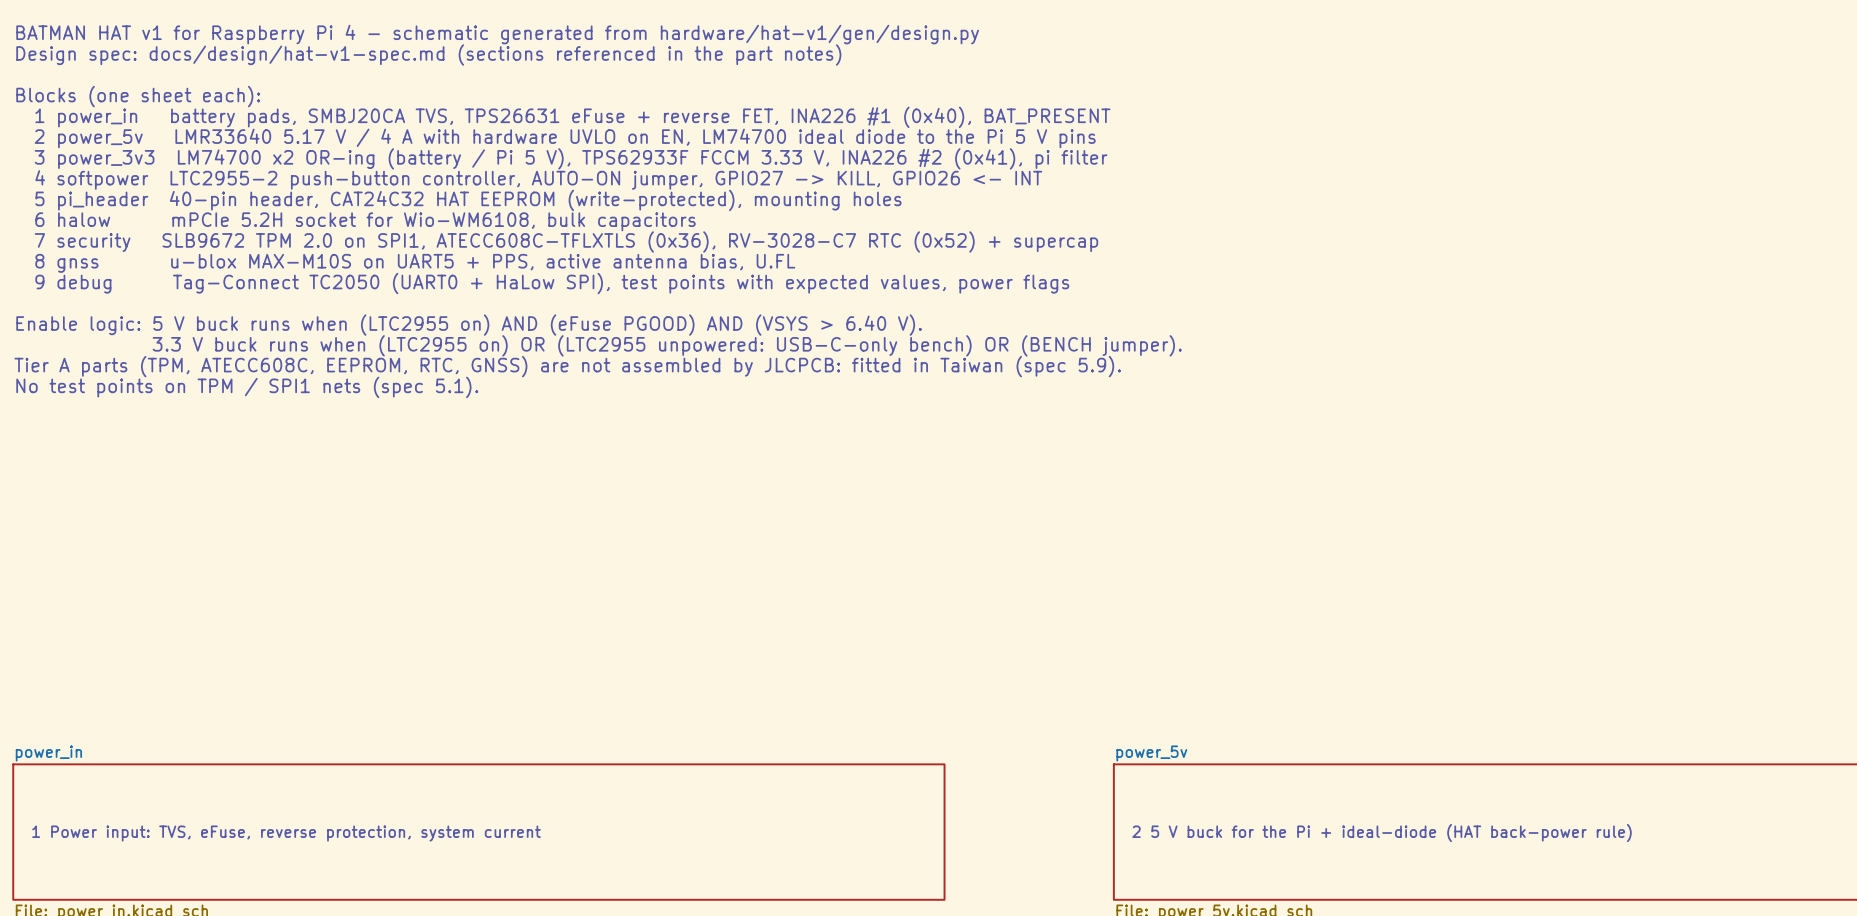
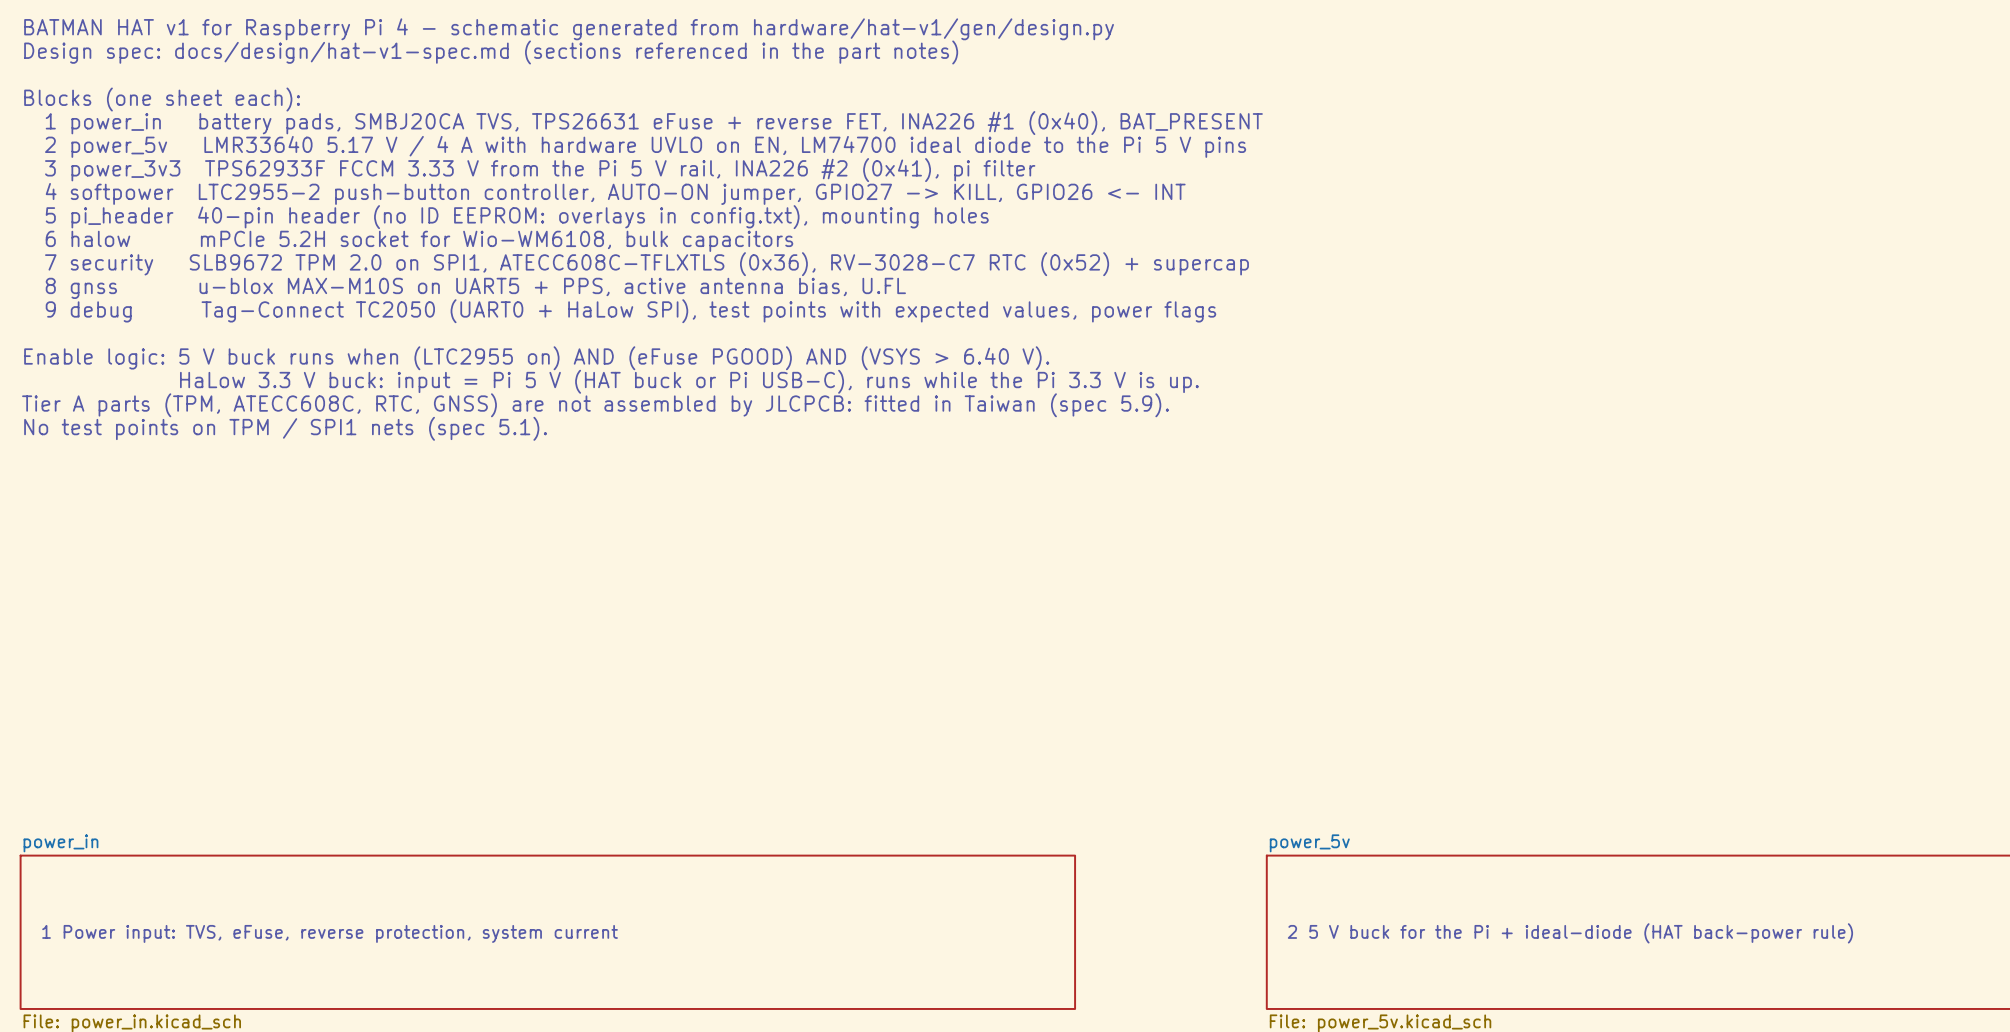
text: 3 power_3v3 LM74700 x2 OR-ing (battery / Pi 5 V), TPS62933F FCCM 3.33 V, INA226 #2 (0x41), pi filter (571, 158) -> 3 power_3v3 TPS62933F FCCM 3.33 V from the Pi 5 V rail, INA226 #2 (0x41), pi filter (540, 170)
text: 5 pi_header 40-pin header, CAT24C32 HAT EEPROM (write-protected), mounting holes (468, 200) -> 5 pi_header 40-pin header (no ID EEPROM: overlays in config.txt), mounting holes (517, 217)
text: 3.3 V buck runs when (LTC2955 on) OR (LTC2955 unpowered: USB-C-only bench) OR (BENCH jumper). (667, 345) -> HaLow 3.3 V buck: input = Pi 5 V (HAT buck or Pi USB-C), runs while the Pi 3.3 V is up. (689, 381)
text: Tier A parts (TPM, ATECC608C, EEPROM, RTC, GNSS) are not assembled by JLCPCB: fitted in Taiwan (spec 5.9). (567, 366) -> Tier A parts (TPM, ATECC608C, RTC, GNSS) are not assembled by JLCPCB: fitted in Taiwan (spec 5.9). (595, 405)

